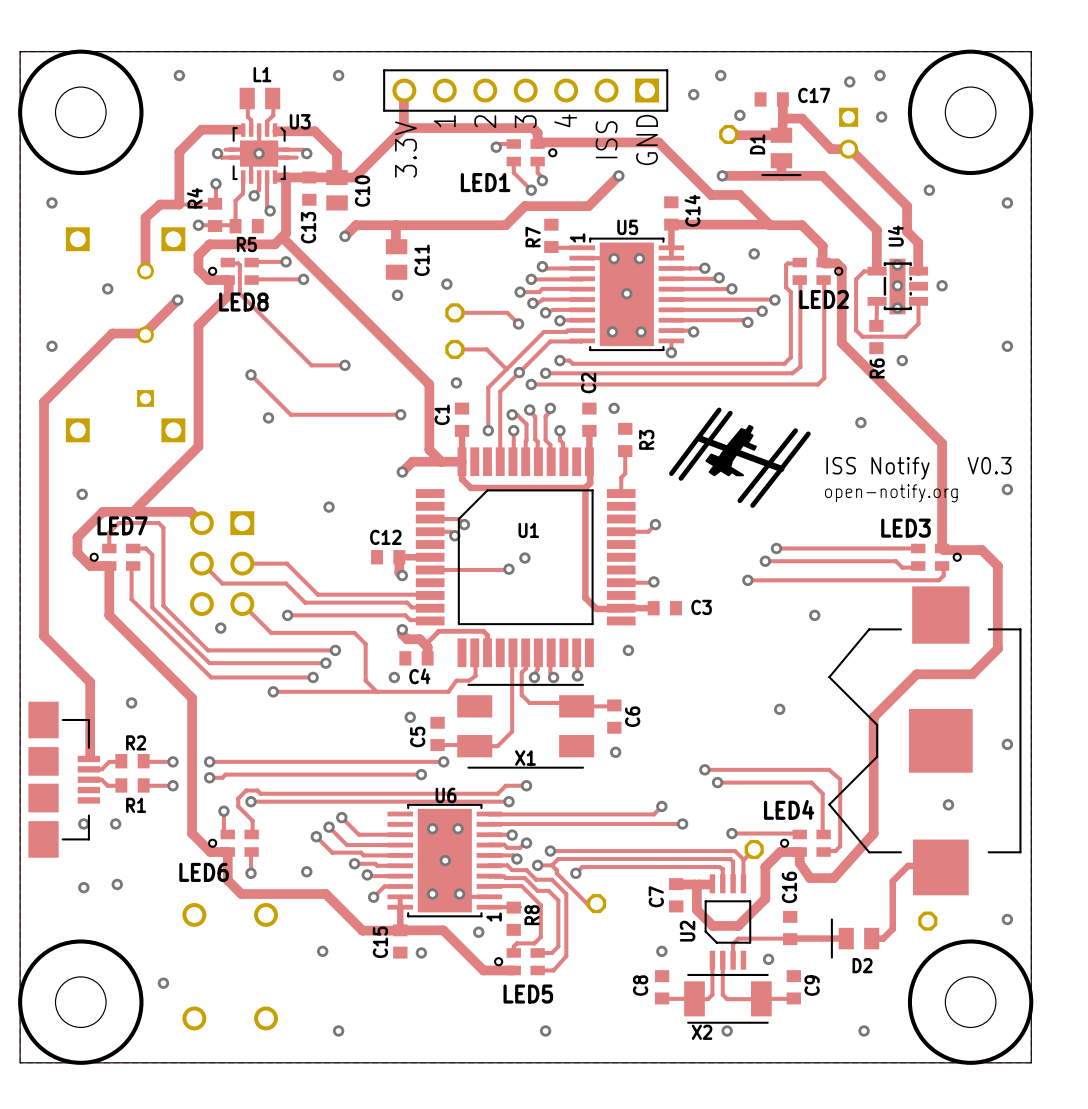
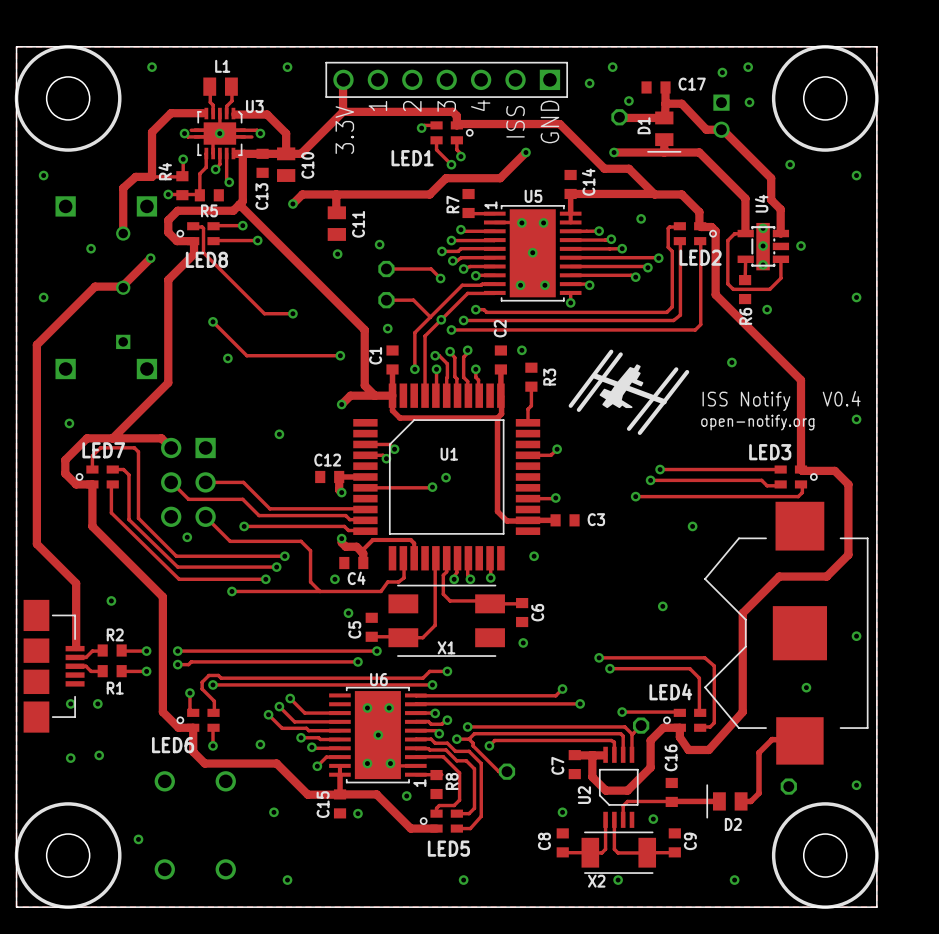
drawing shape: [669, 407, 1012, 508] -> [568, 349, 861, 435]

